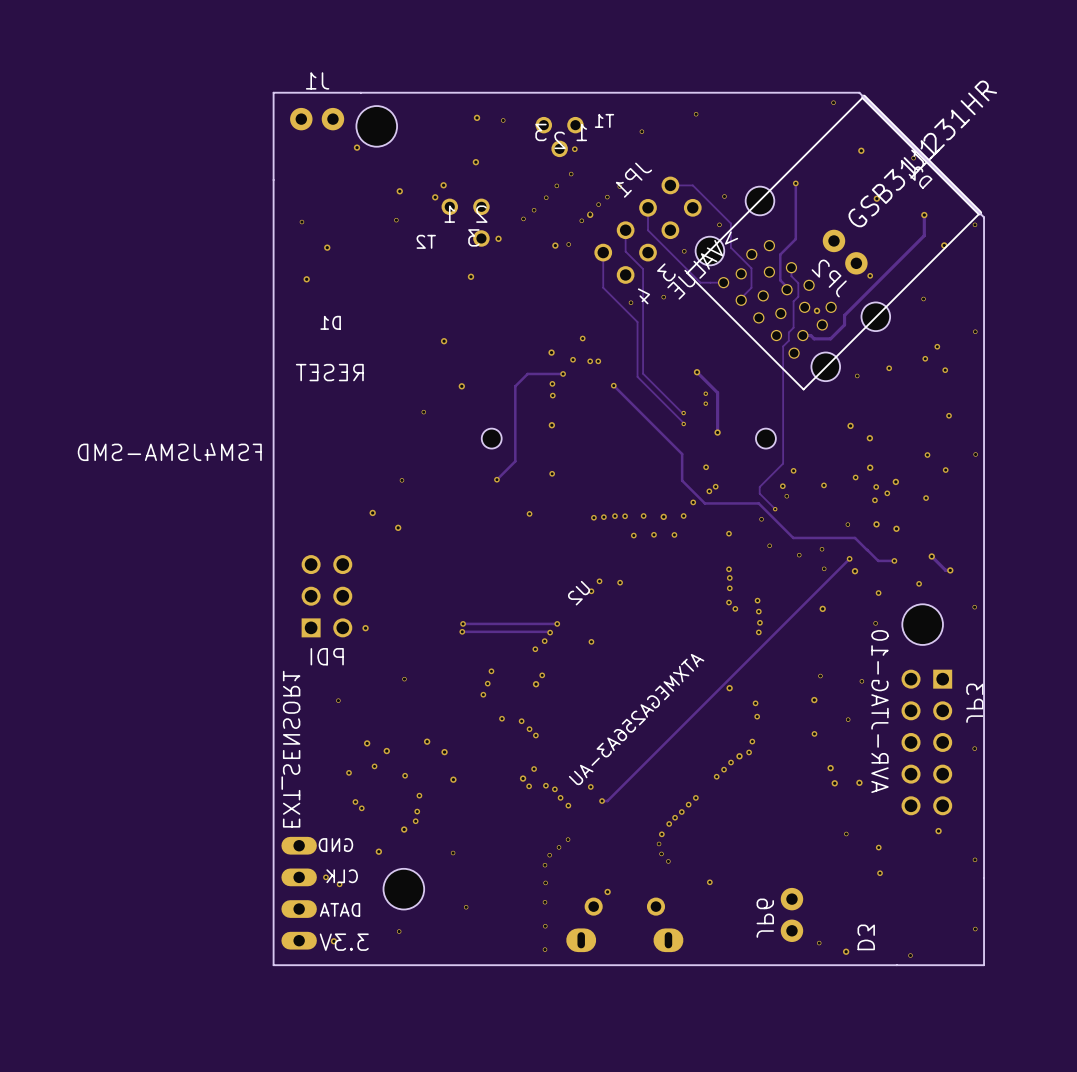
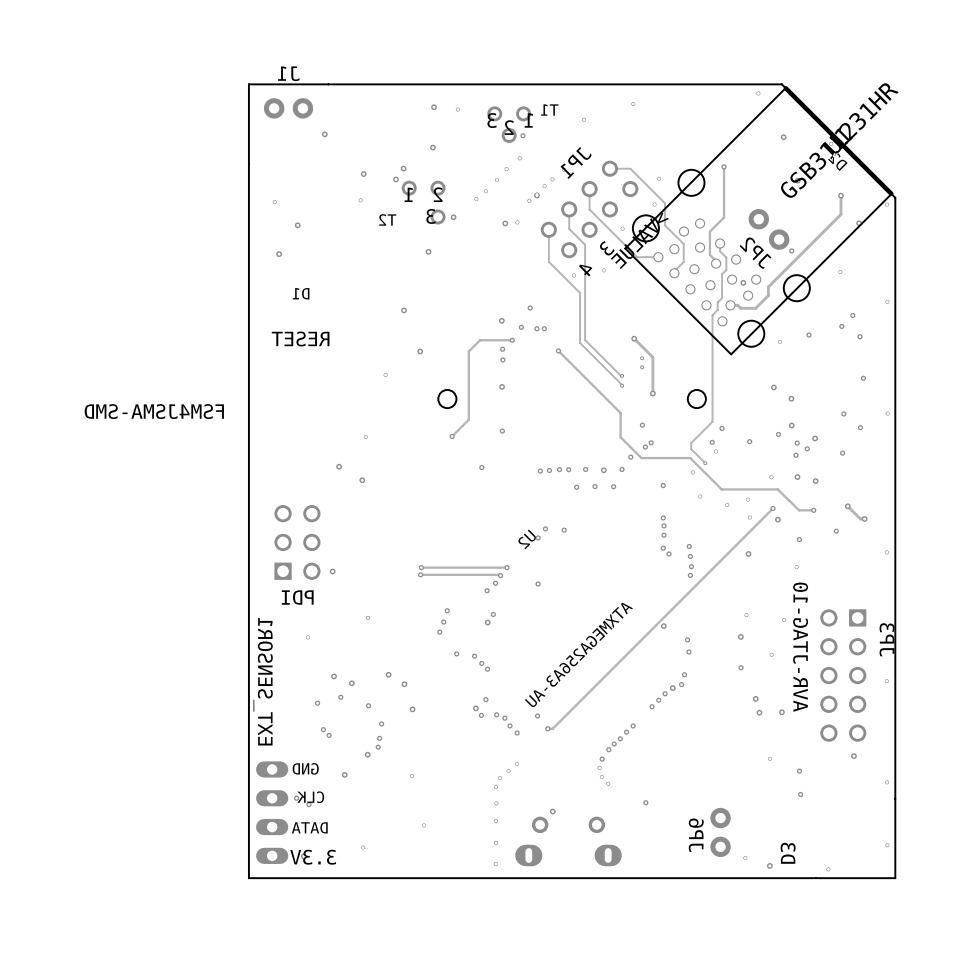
part: (376, 126) -> none
part: (922, 624) -> none
part: (403, 889) -> none

